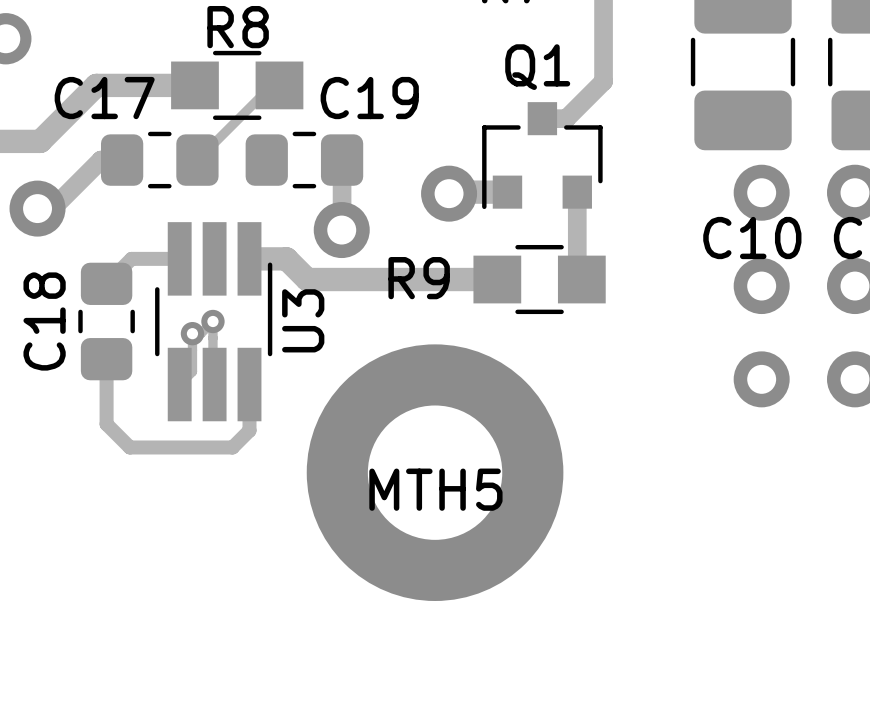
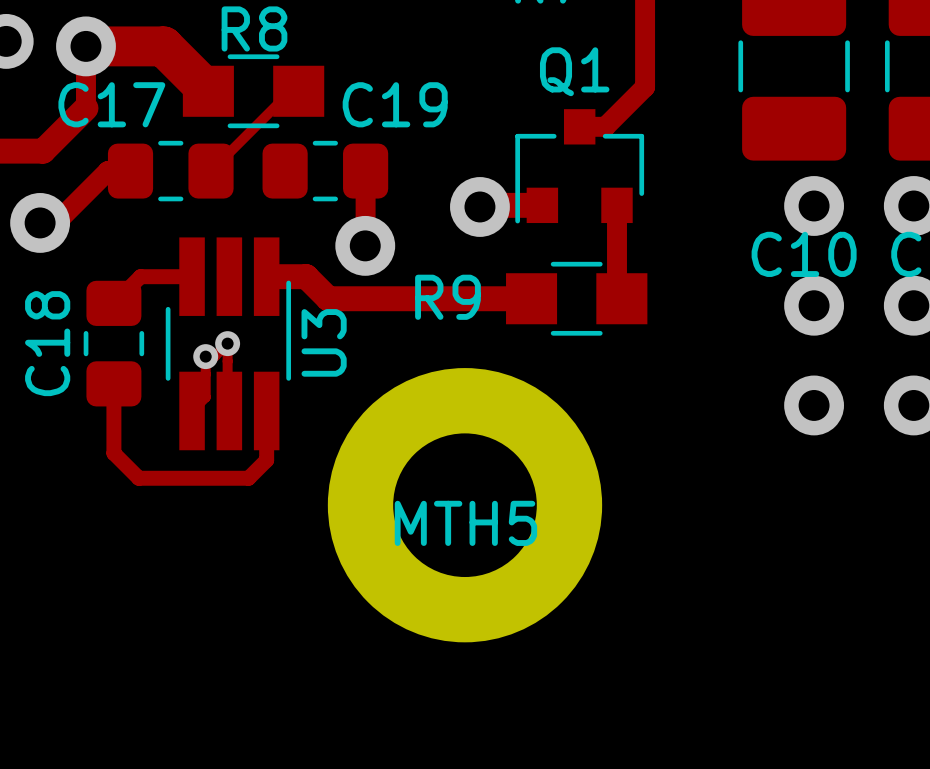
via: none -> (85, 46)
track: (194, 85) (96, 85) (80, 101) -> (208, 91) (163, 46) (85, 46) (85, 108)

